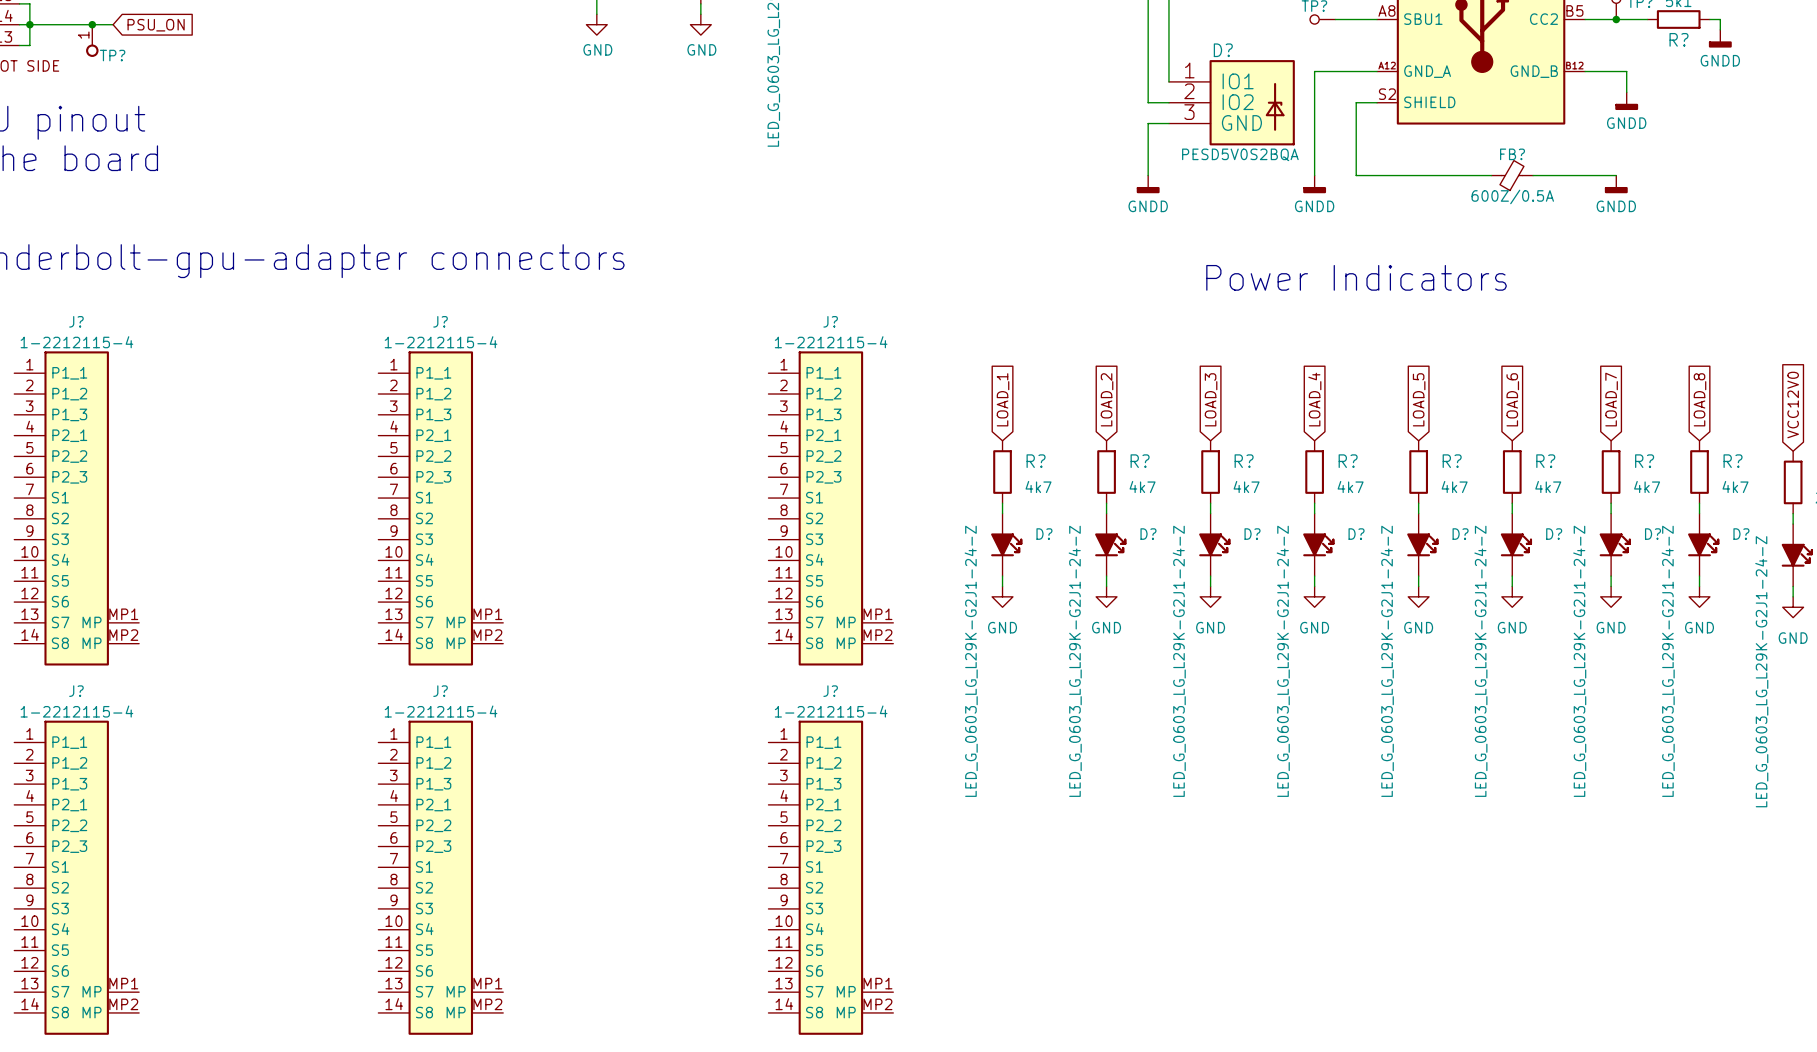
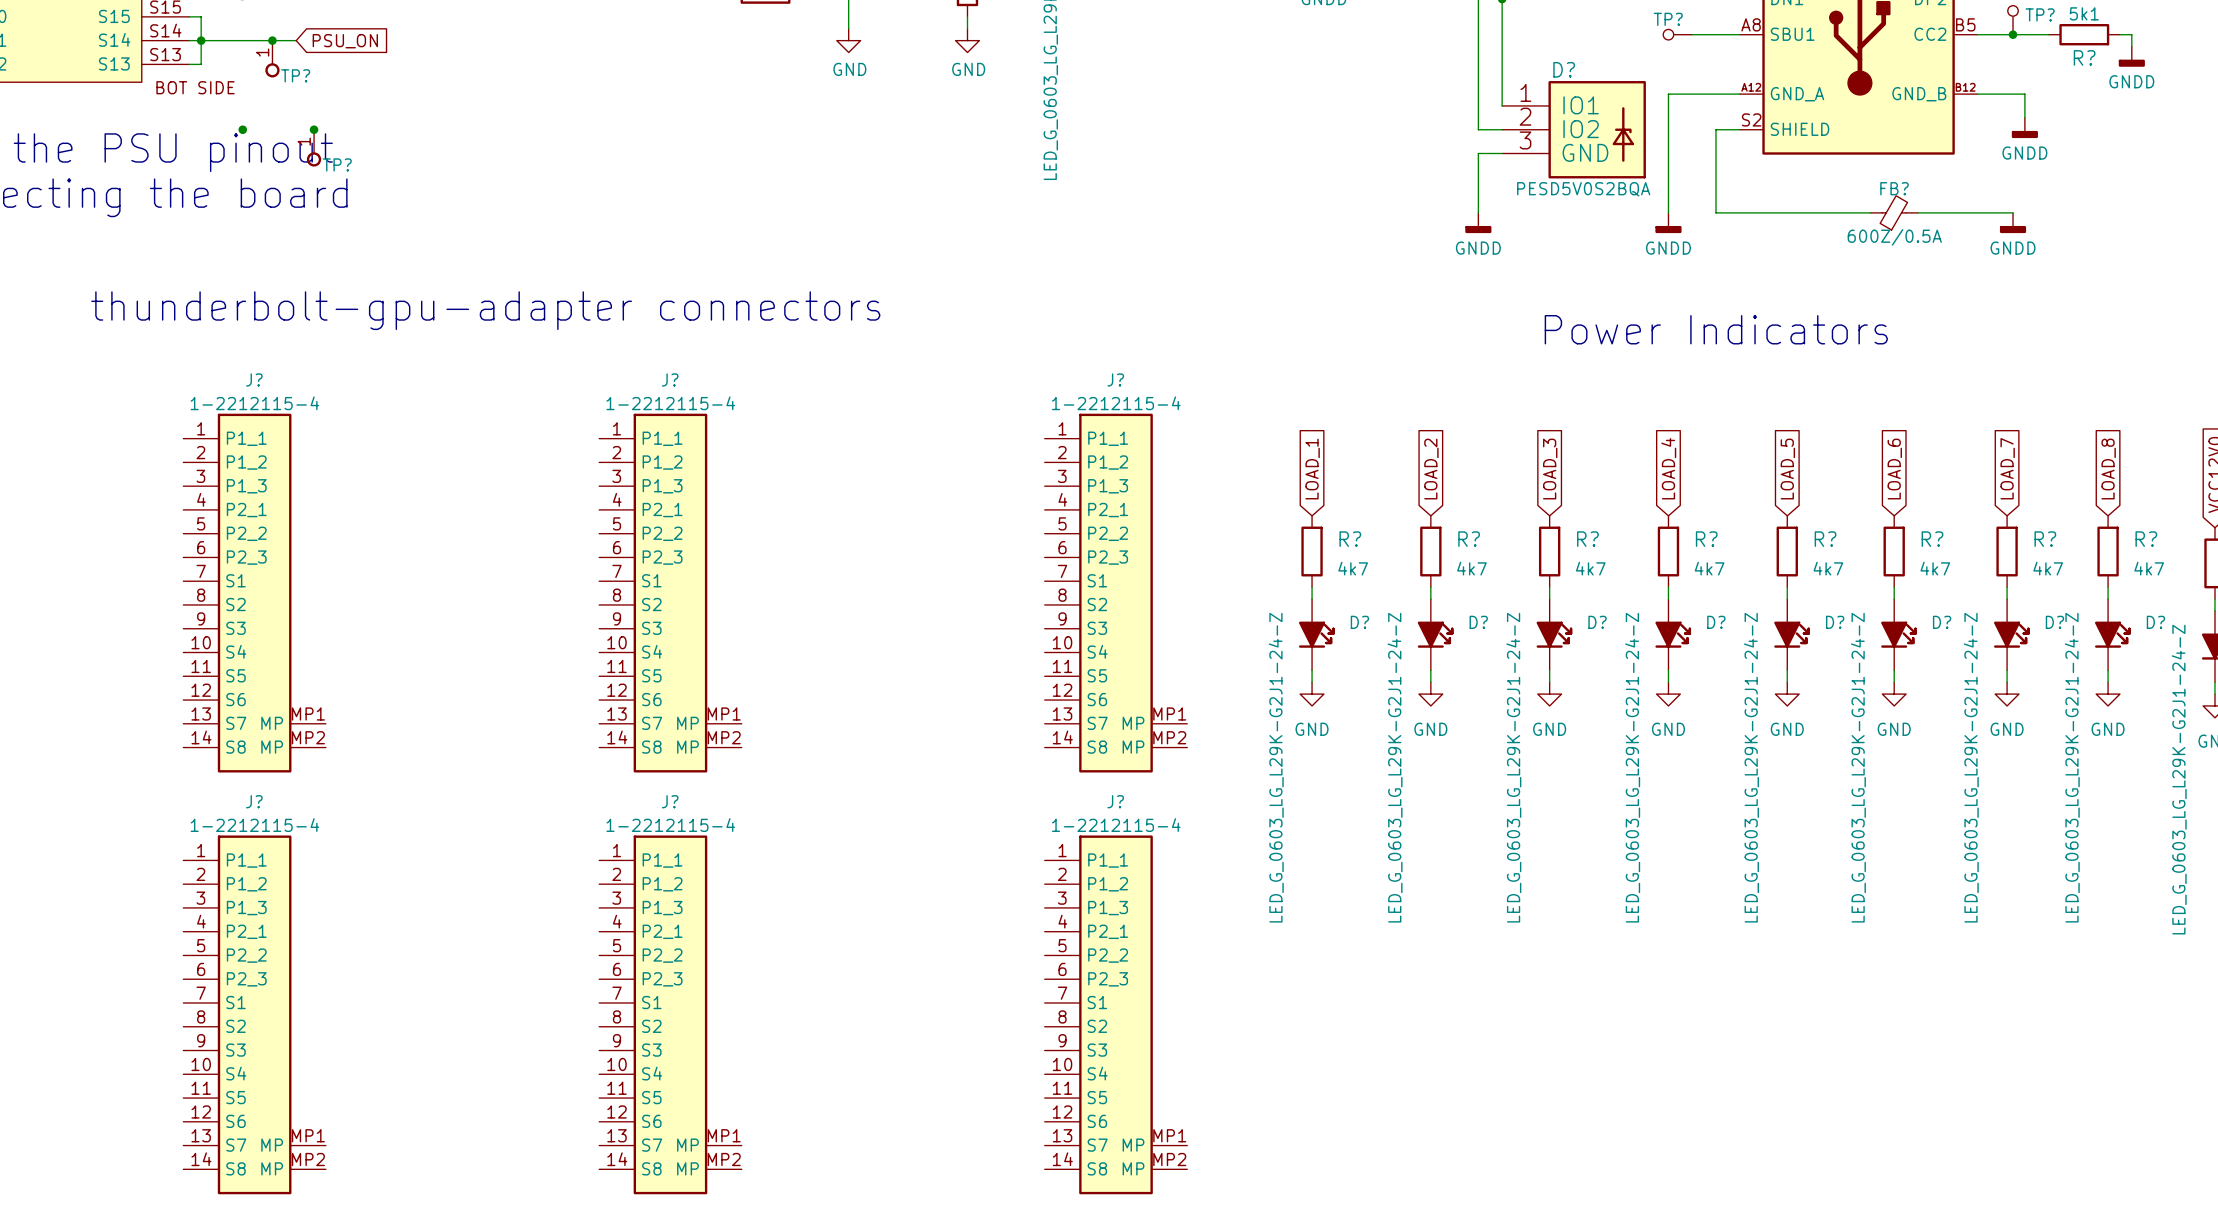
junction: none -> (242, 129)
junction: none -> (314, 129)
TP?: none -> (314, 148)

